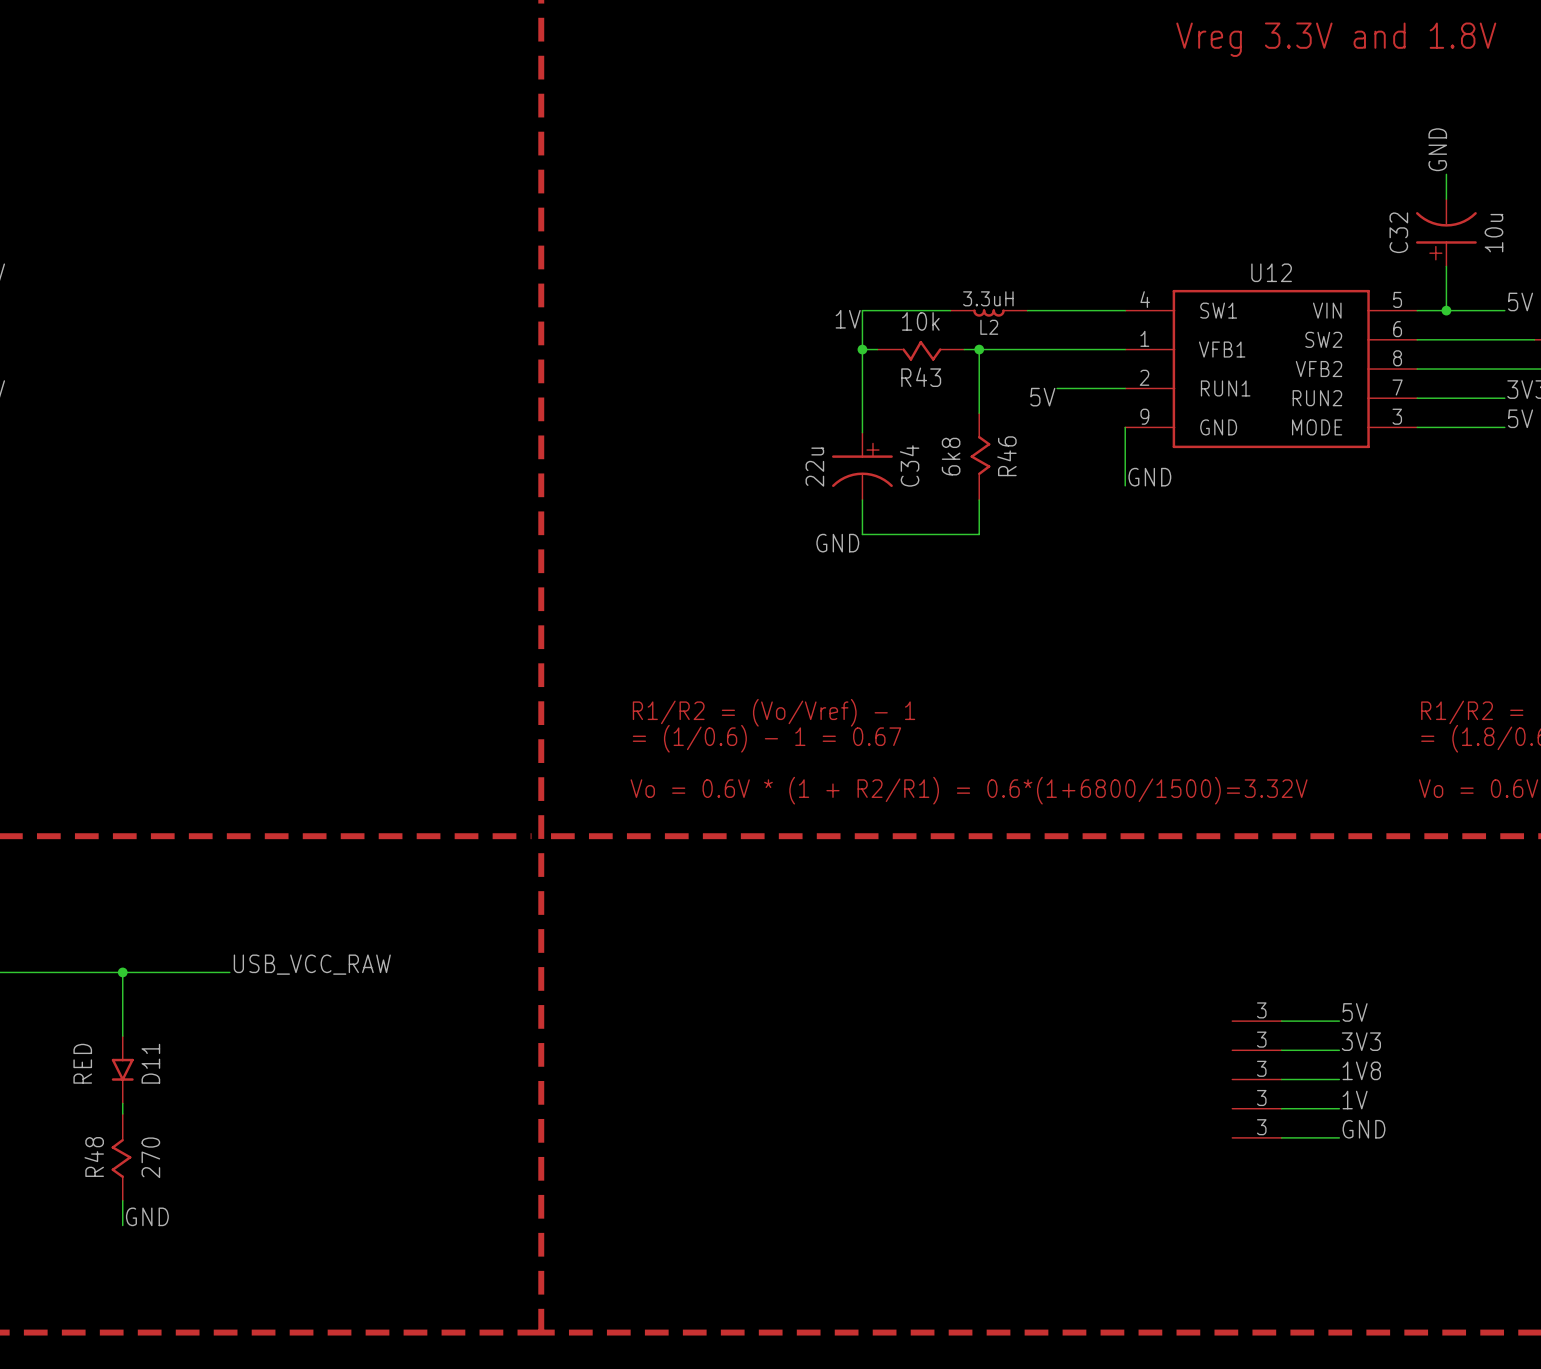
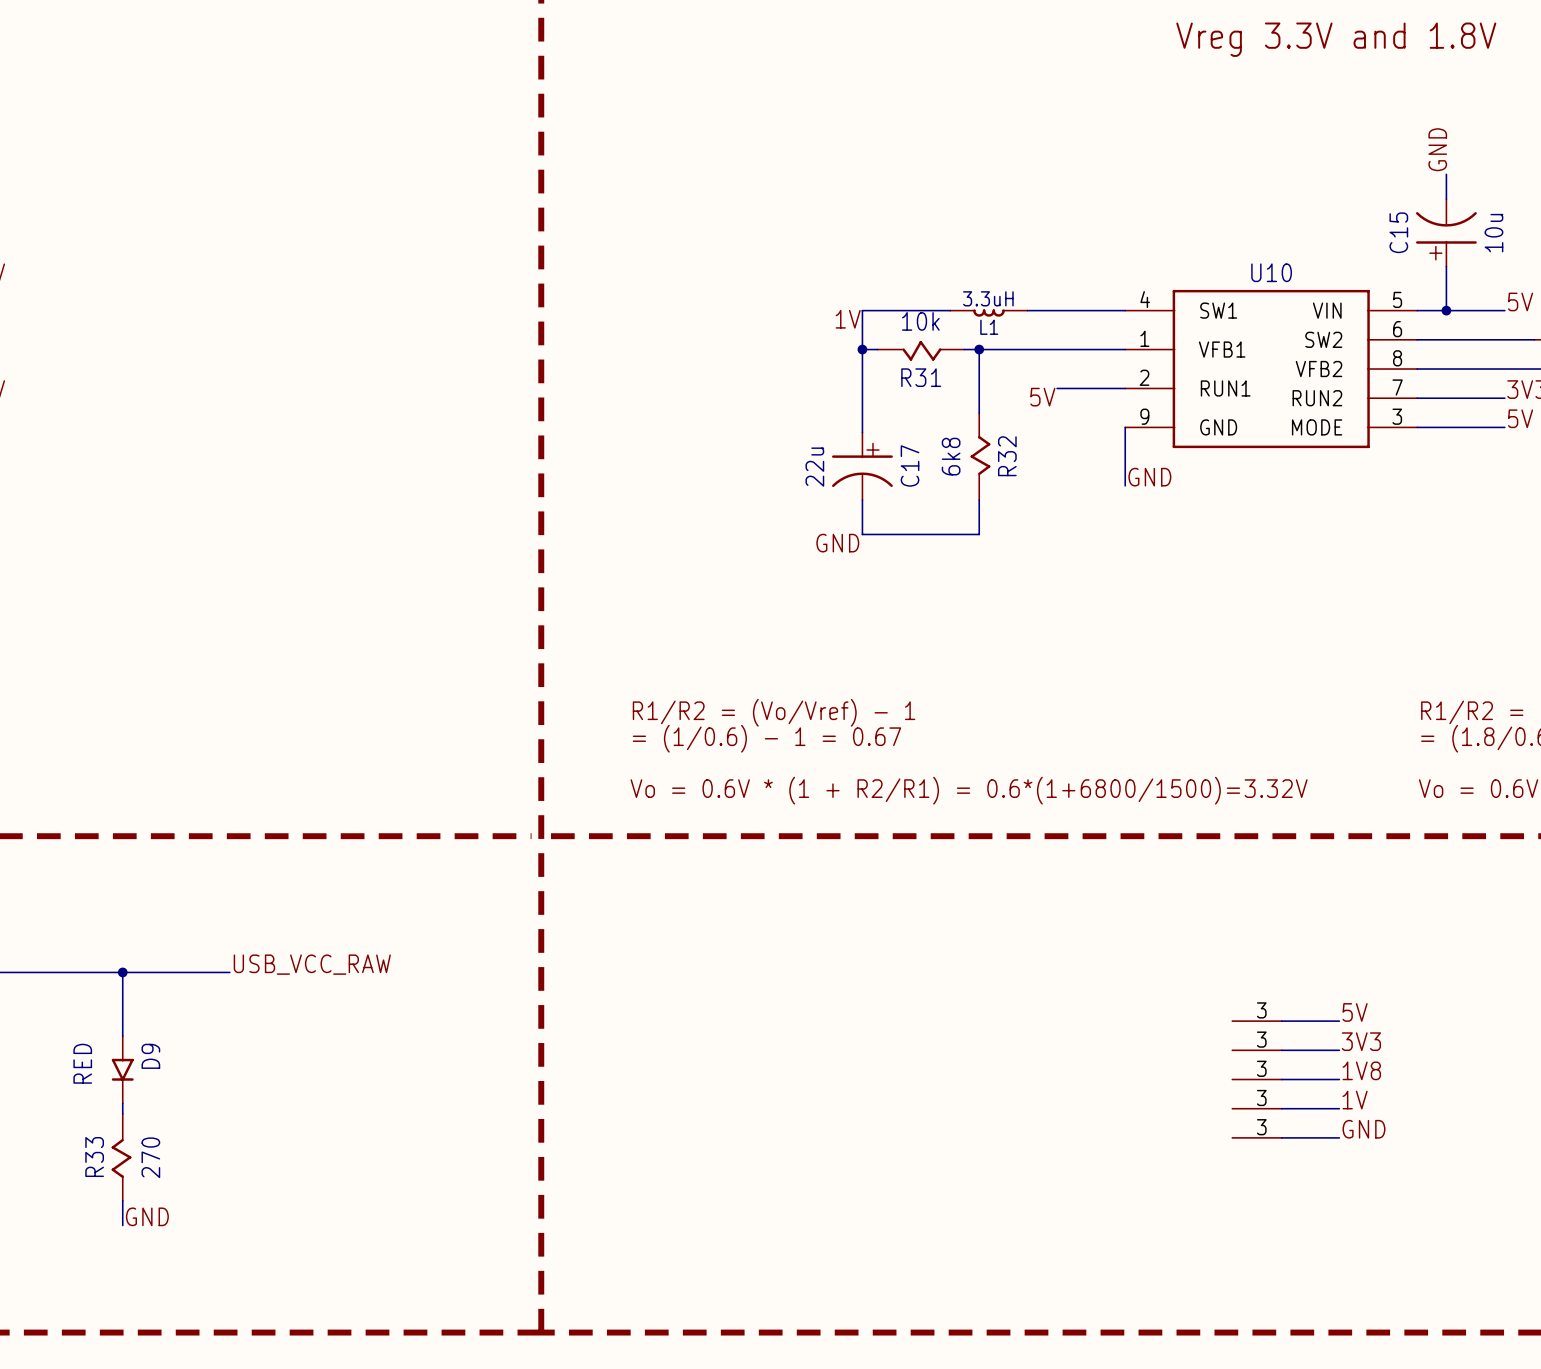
C32 name: C32 (1398, 232) -> C15 (1398, 232)
U12 name: U12 (1271, 272) -> U10 (1271, 272)
L2 name: L2 (989, 327) -> L1 (989, 327)
R43 name: R43 (921, 377) -> R31 (921, 377)
R46 name: R46 (1006, 456) -> R32 (1007, 456)
C34 name: C34 (909, 465) -> C17 (910, 465)
D11 name: D11 (150, 1063) -> D9 (150, 1056)
R48 name: R48 (94, 1157) -> R33 (94, 1157)

